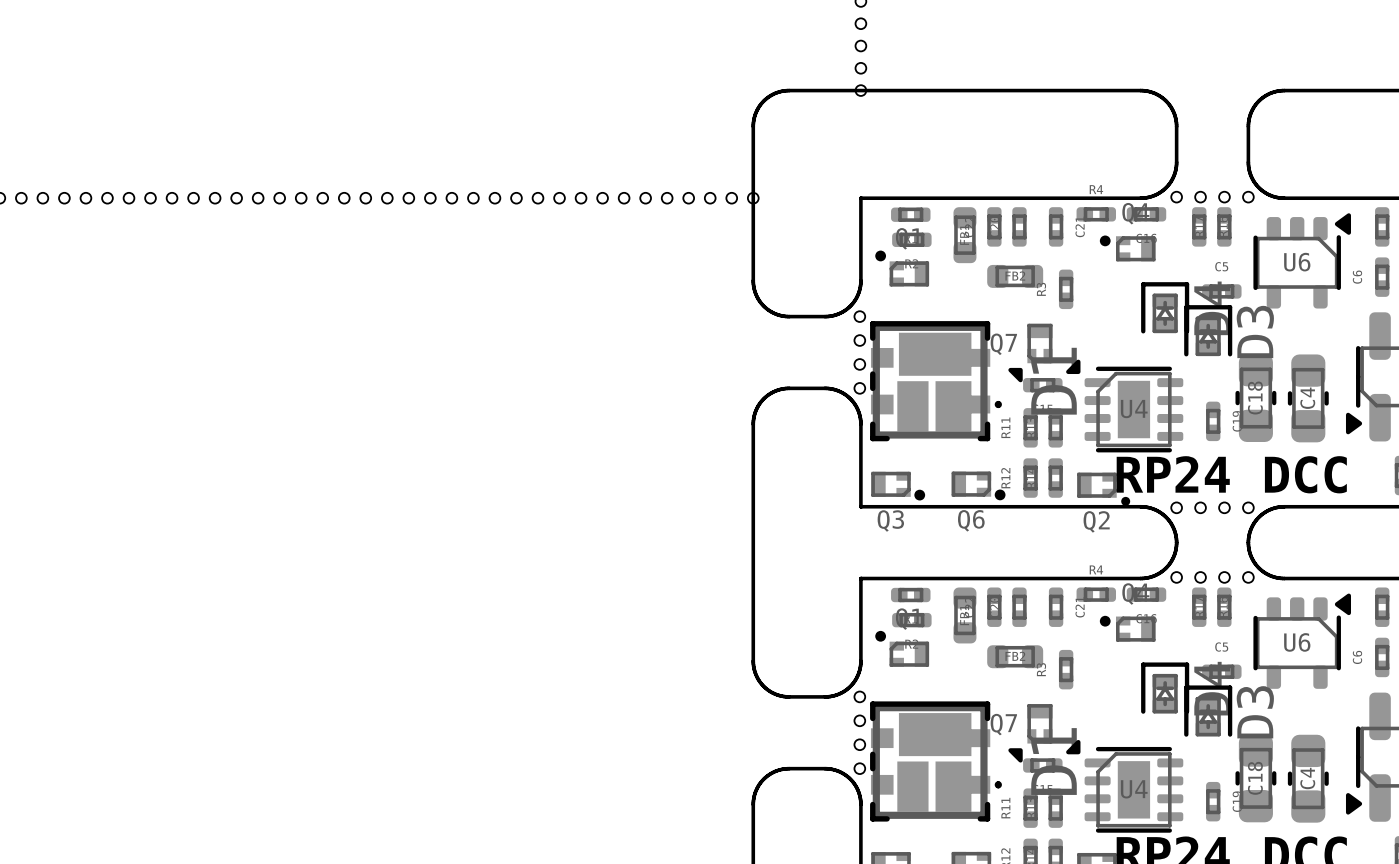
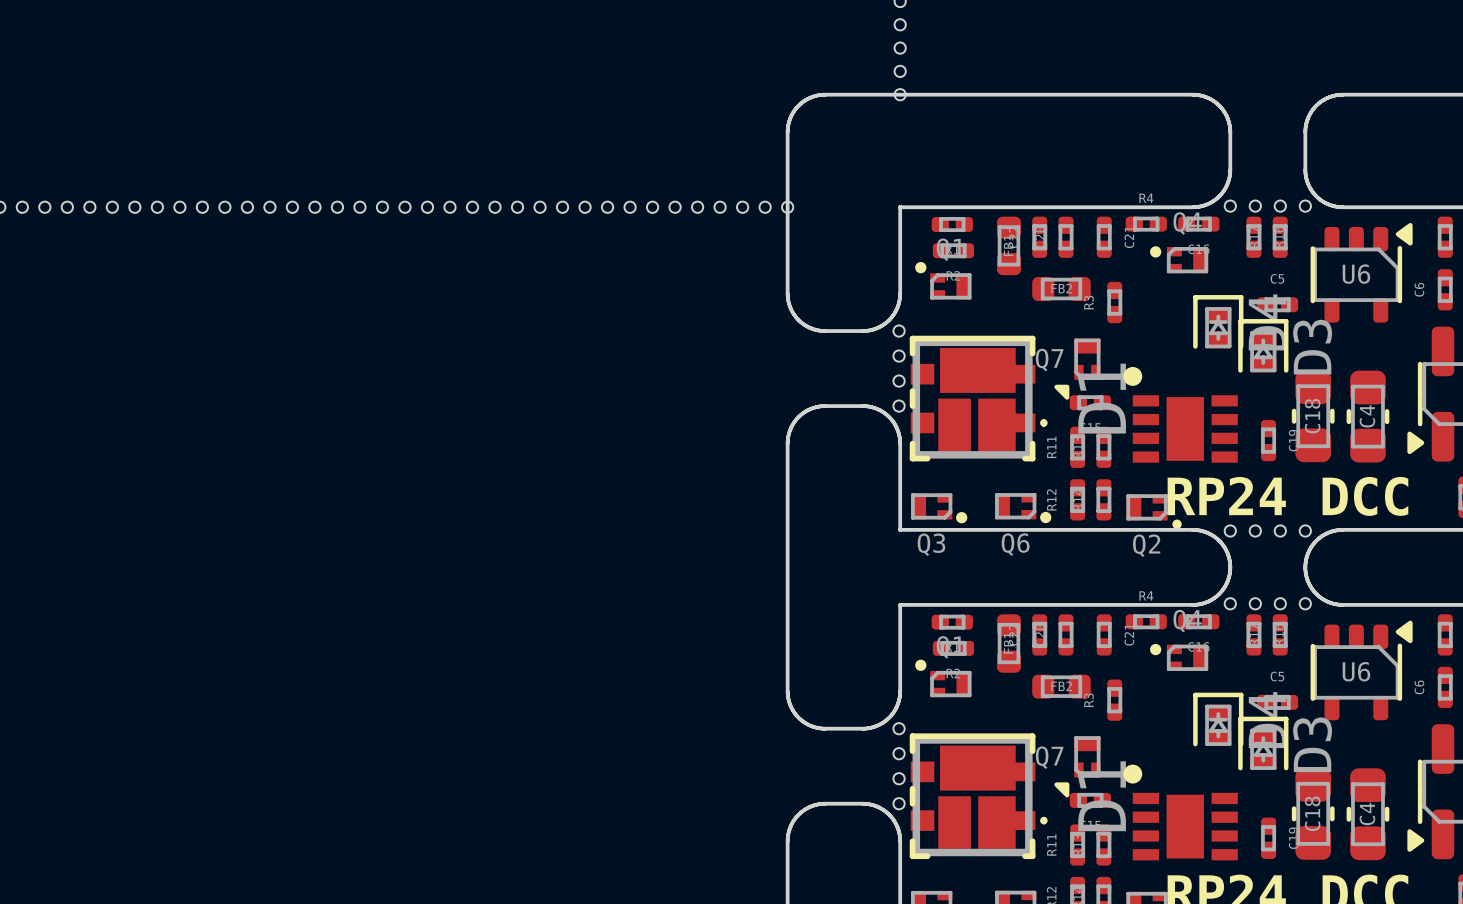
part: none -> (1180, 414)
part: (1124, 406) -> none
part: none -> (1180, 812)
part: (1124, 786) -> none

